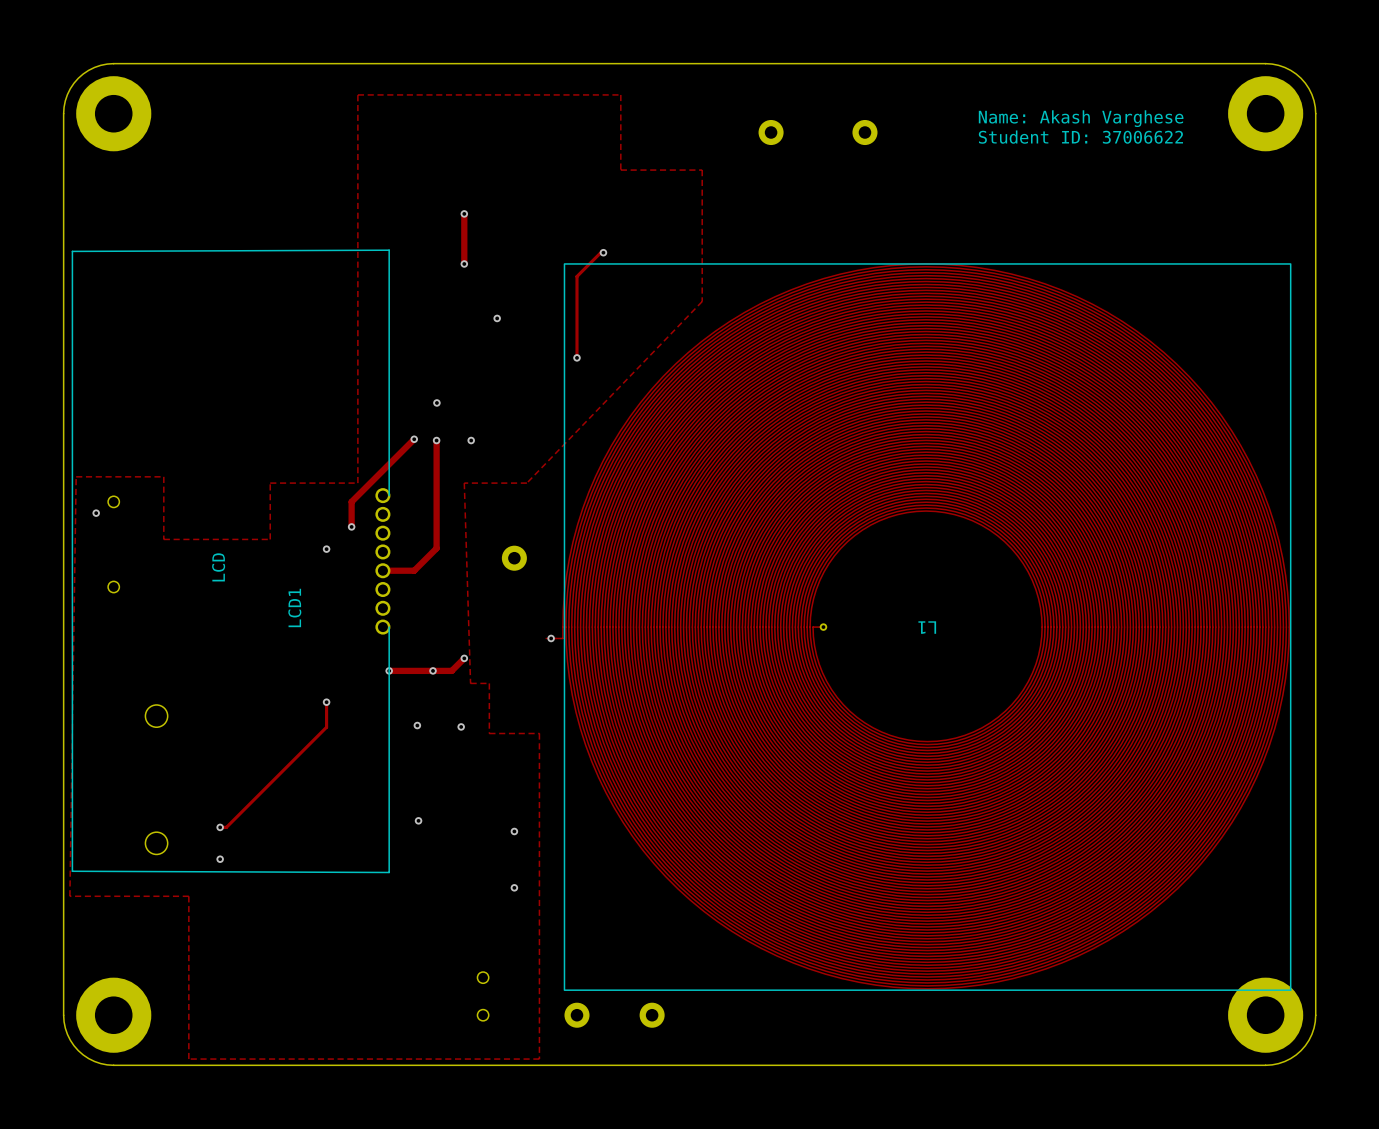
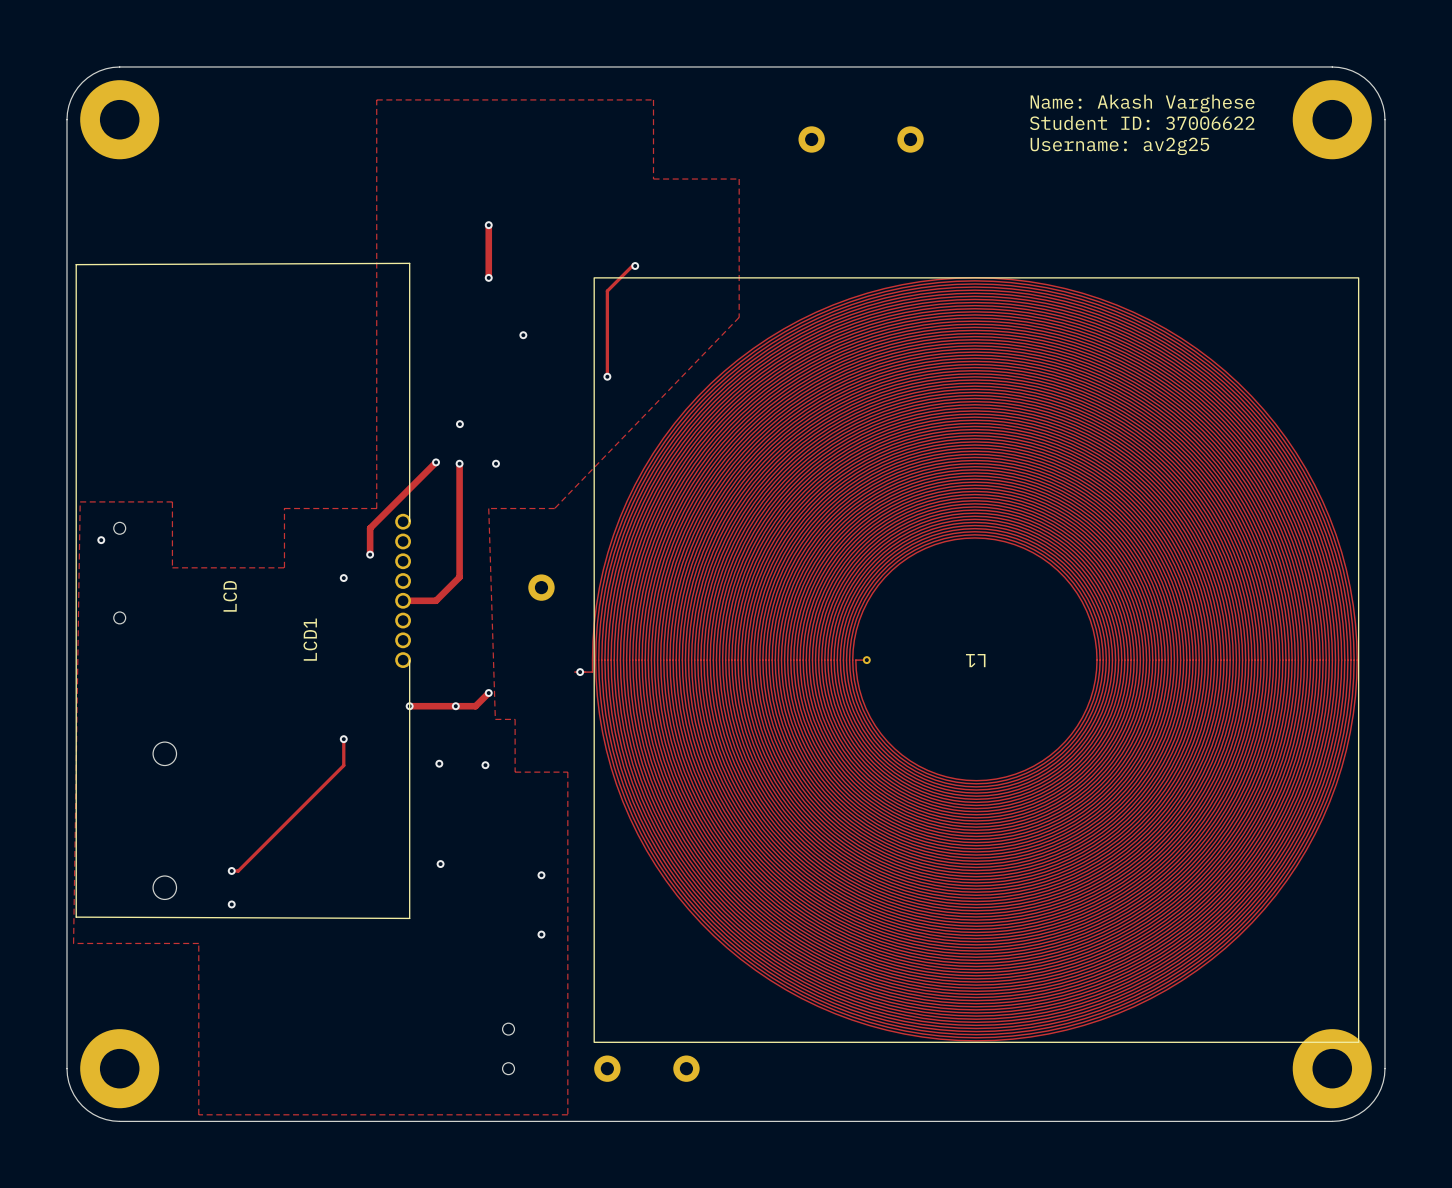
text: none -> Name: Akash Varghese (1142, 103)
text: Name: Akash Varghese (1081, 118) -> Student ID: 37006622 (1142, 122)
text: Student ID: 37006622 (1080, 137) -> Username: av2g25 (1119, 146)

